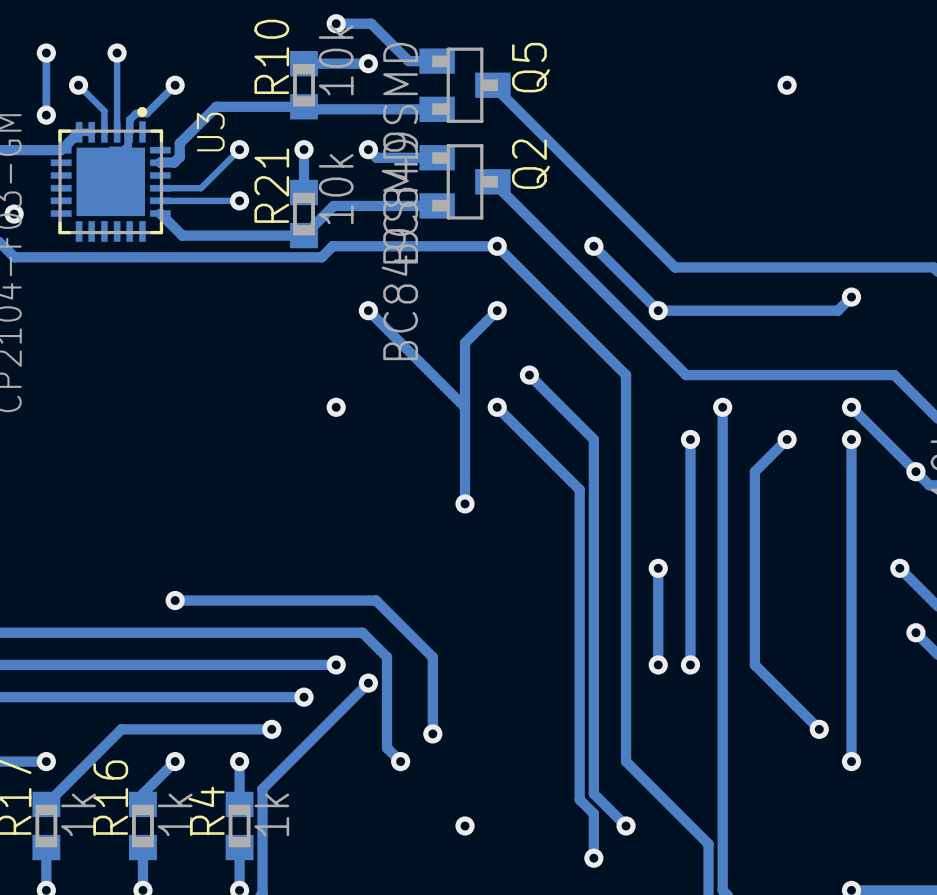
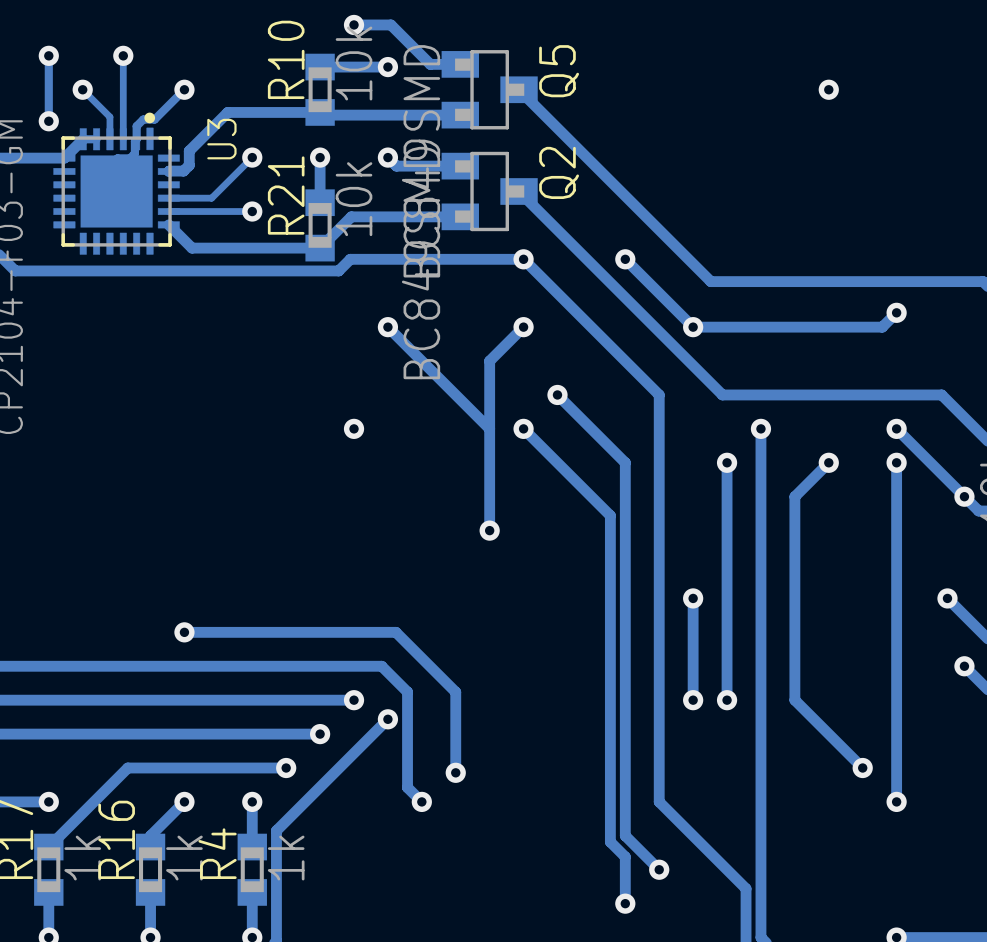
via: (14, 214) -> none
via: (465, 825) -> none

